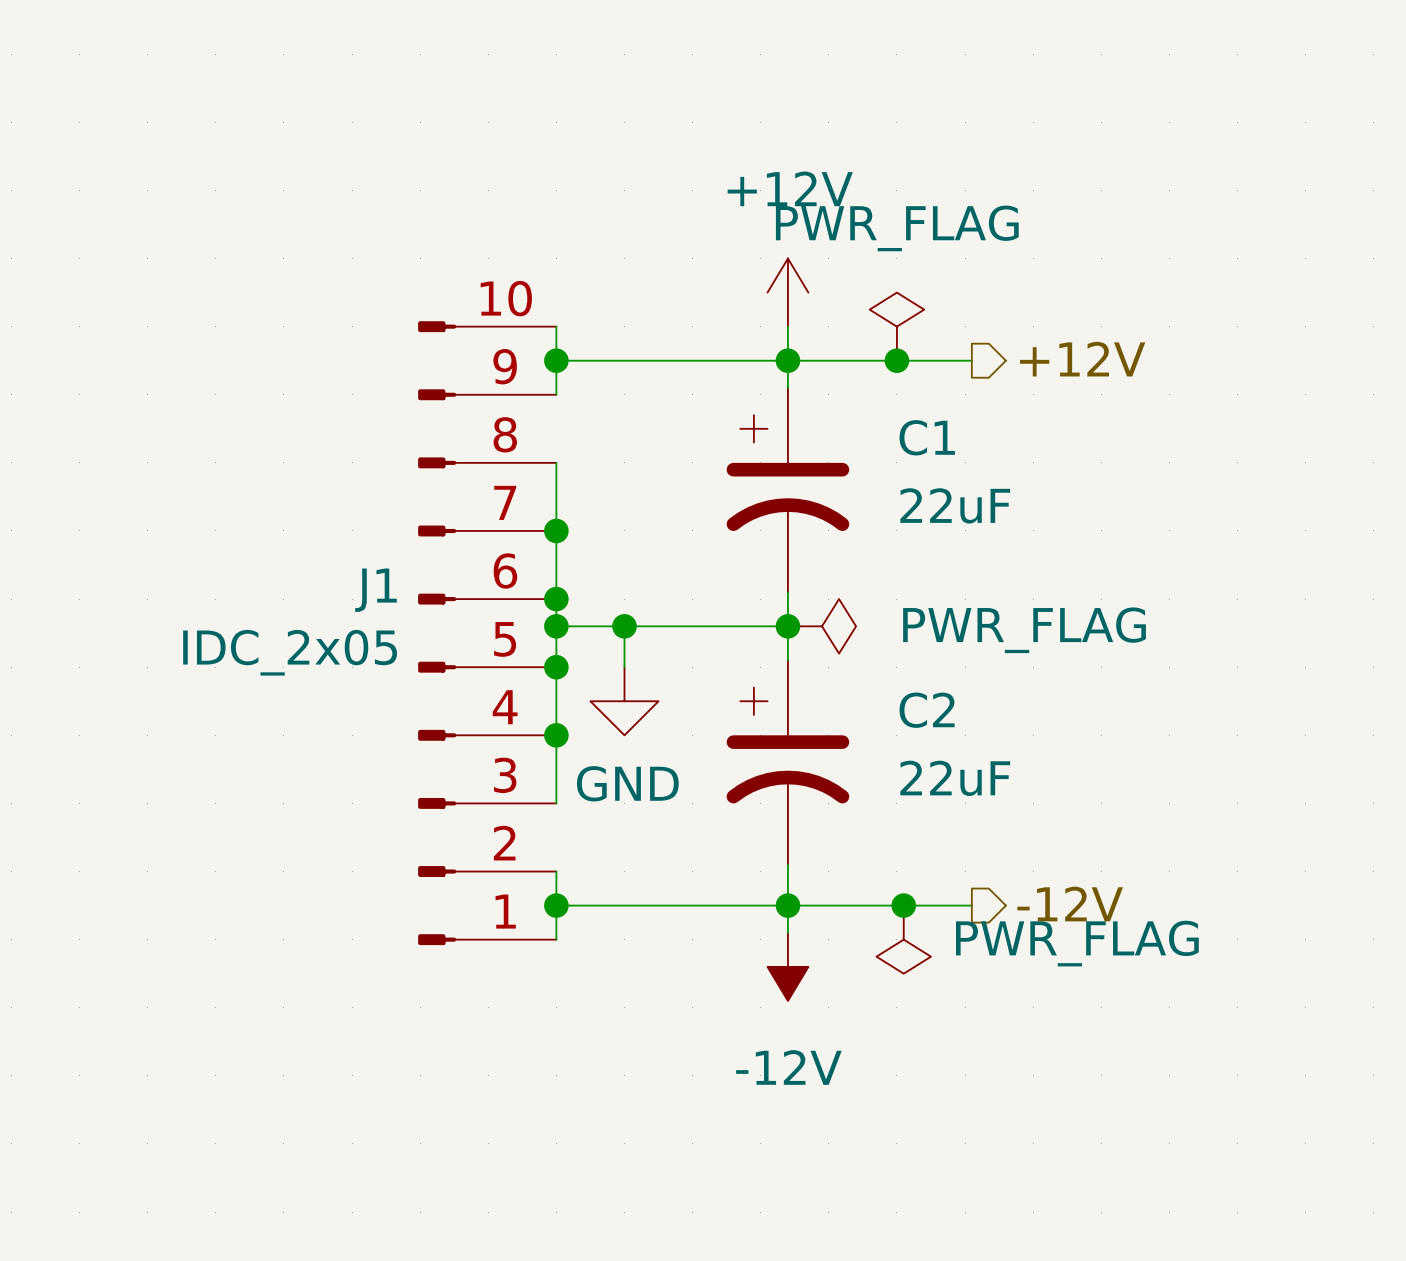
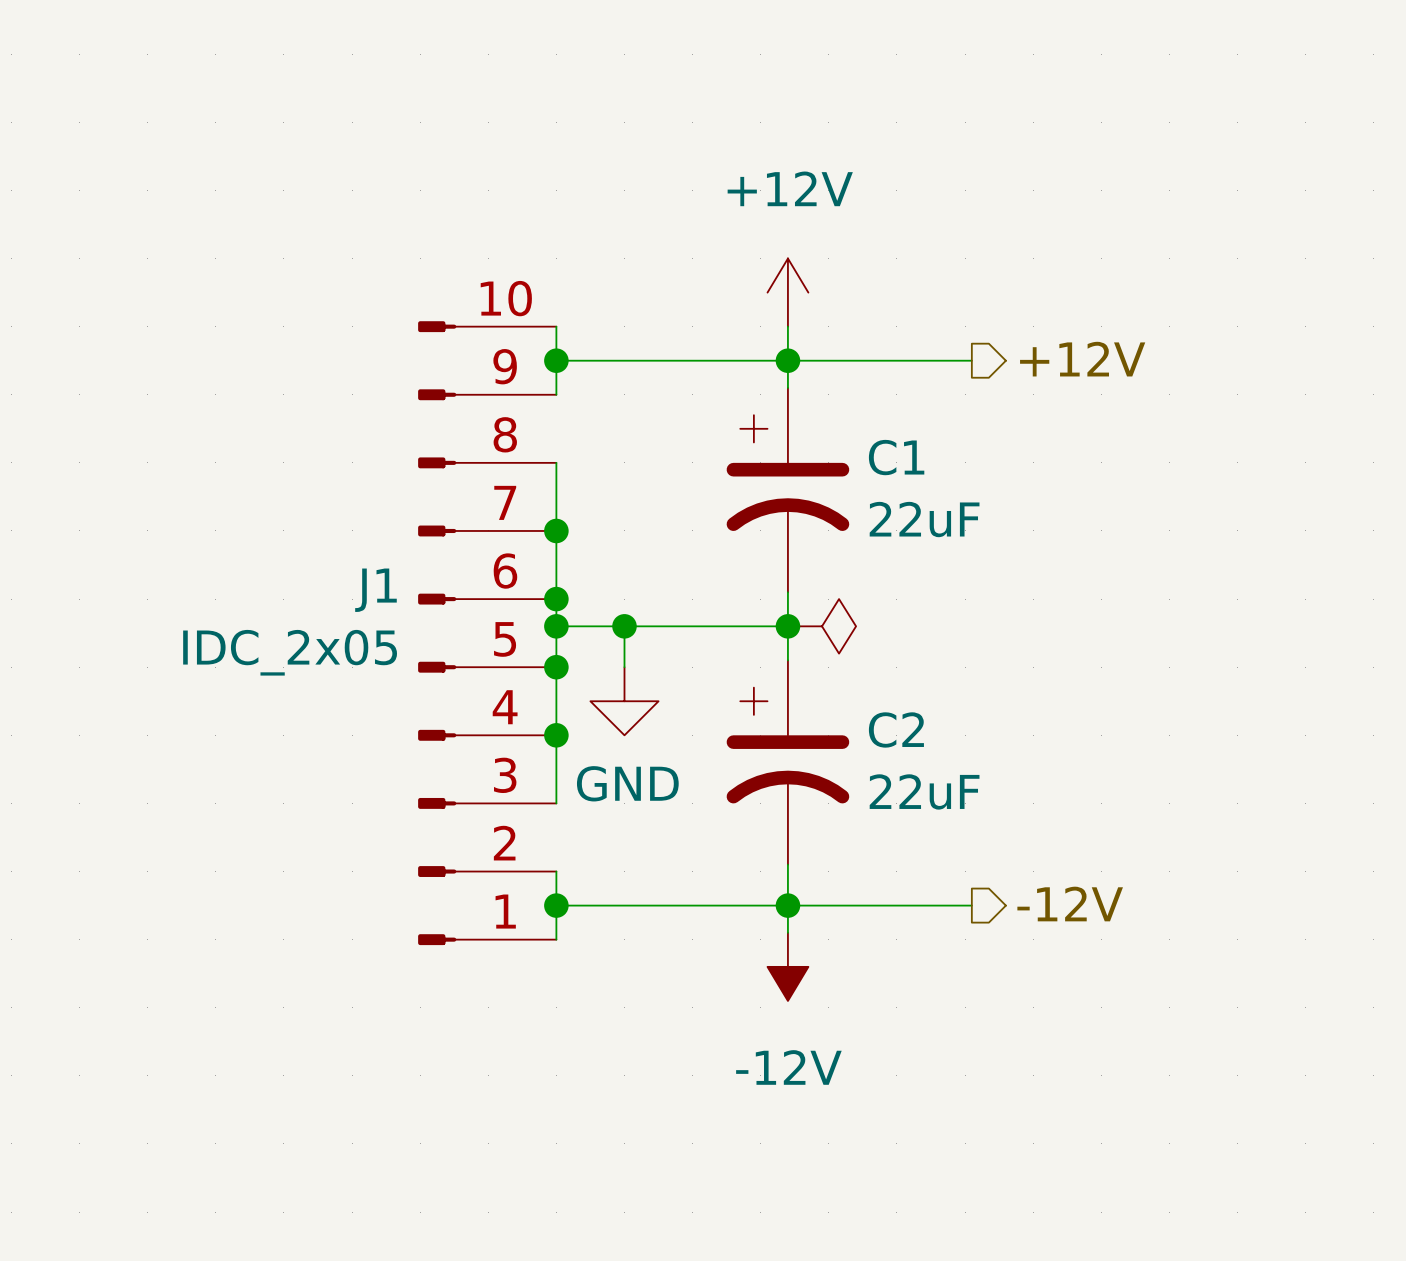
power symbol: PWR_FLAG (896, 326) -> none
junction: (896, 360) -> none
C1 name position: C1 (927, 437) -> C1 (896, 457)
C1 value position: 22uF (955, 505) -> 22uF (924, 519)
power symbol text: PWR_FLAG (1024, 630) -> none
C2 name position: C2 (927, 710) -> C2 (896, 729)
C2 value position: 22uF (955, 778) -> 22uF (924, 791)
junction: (903, 905) -> none
power symbol: PWR_FLAG (903, 939) -> none

